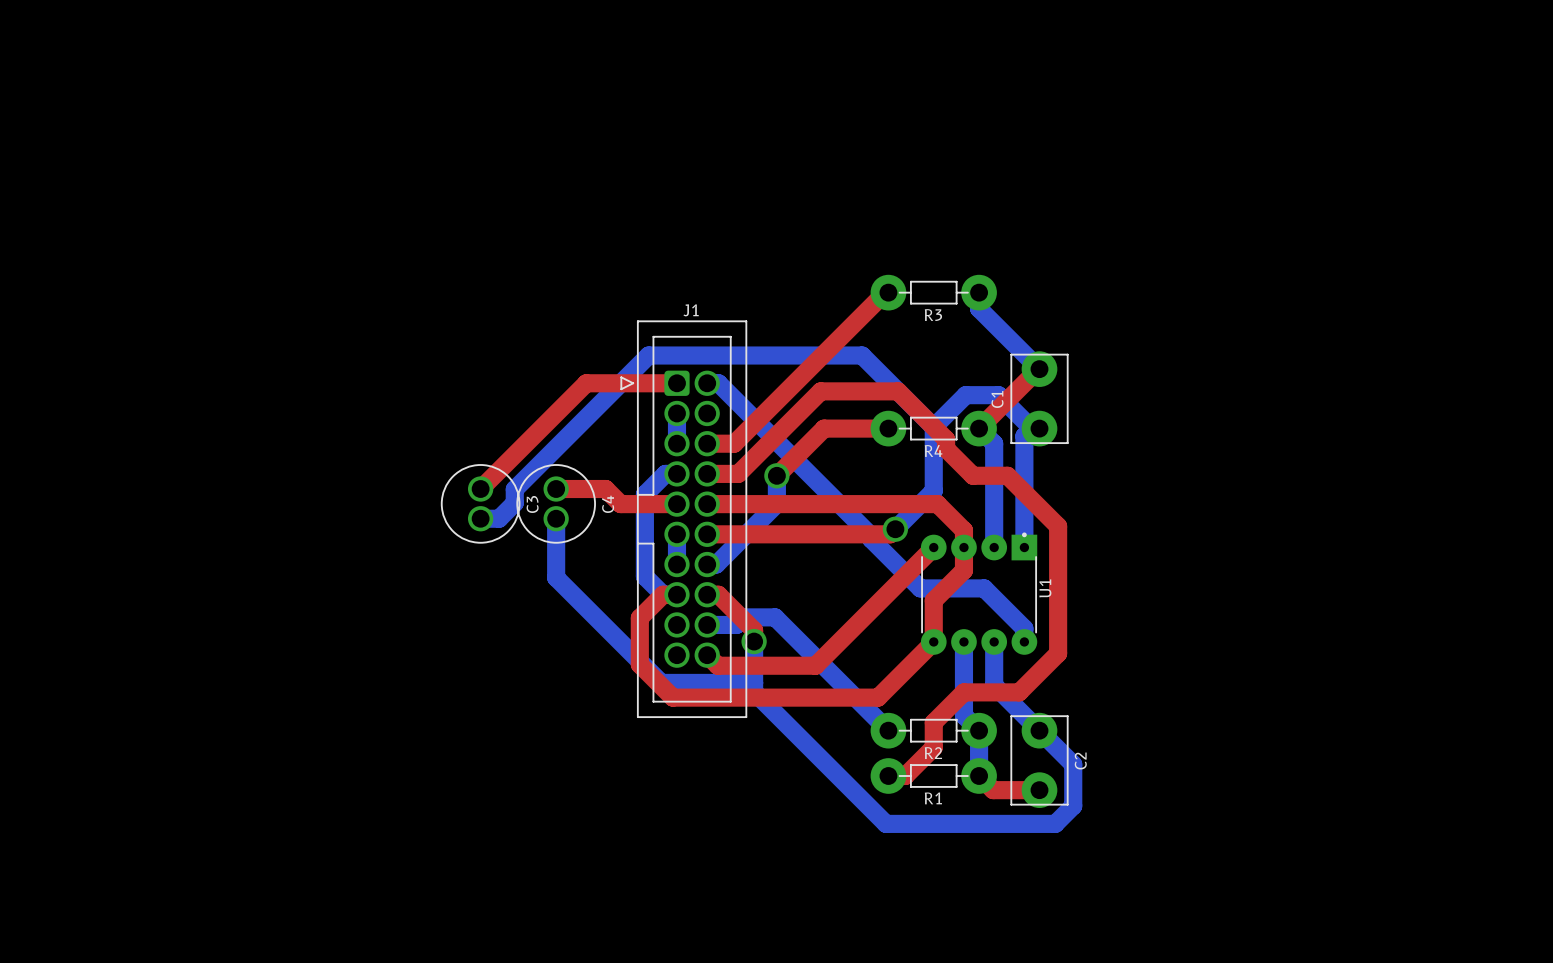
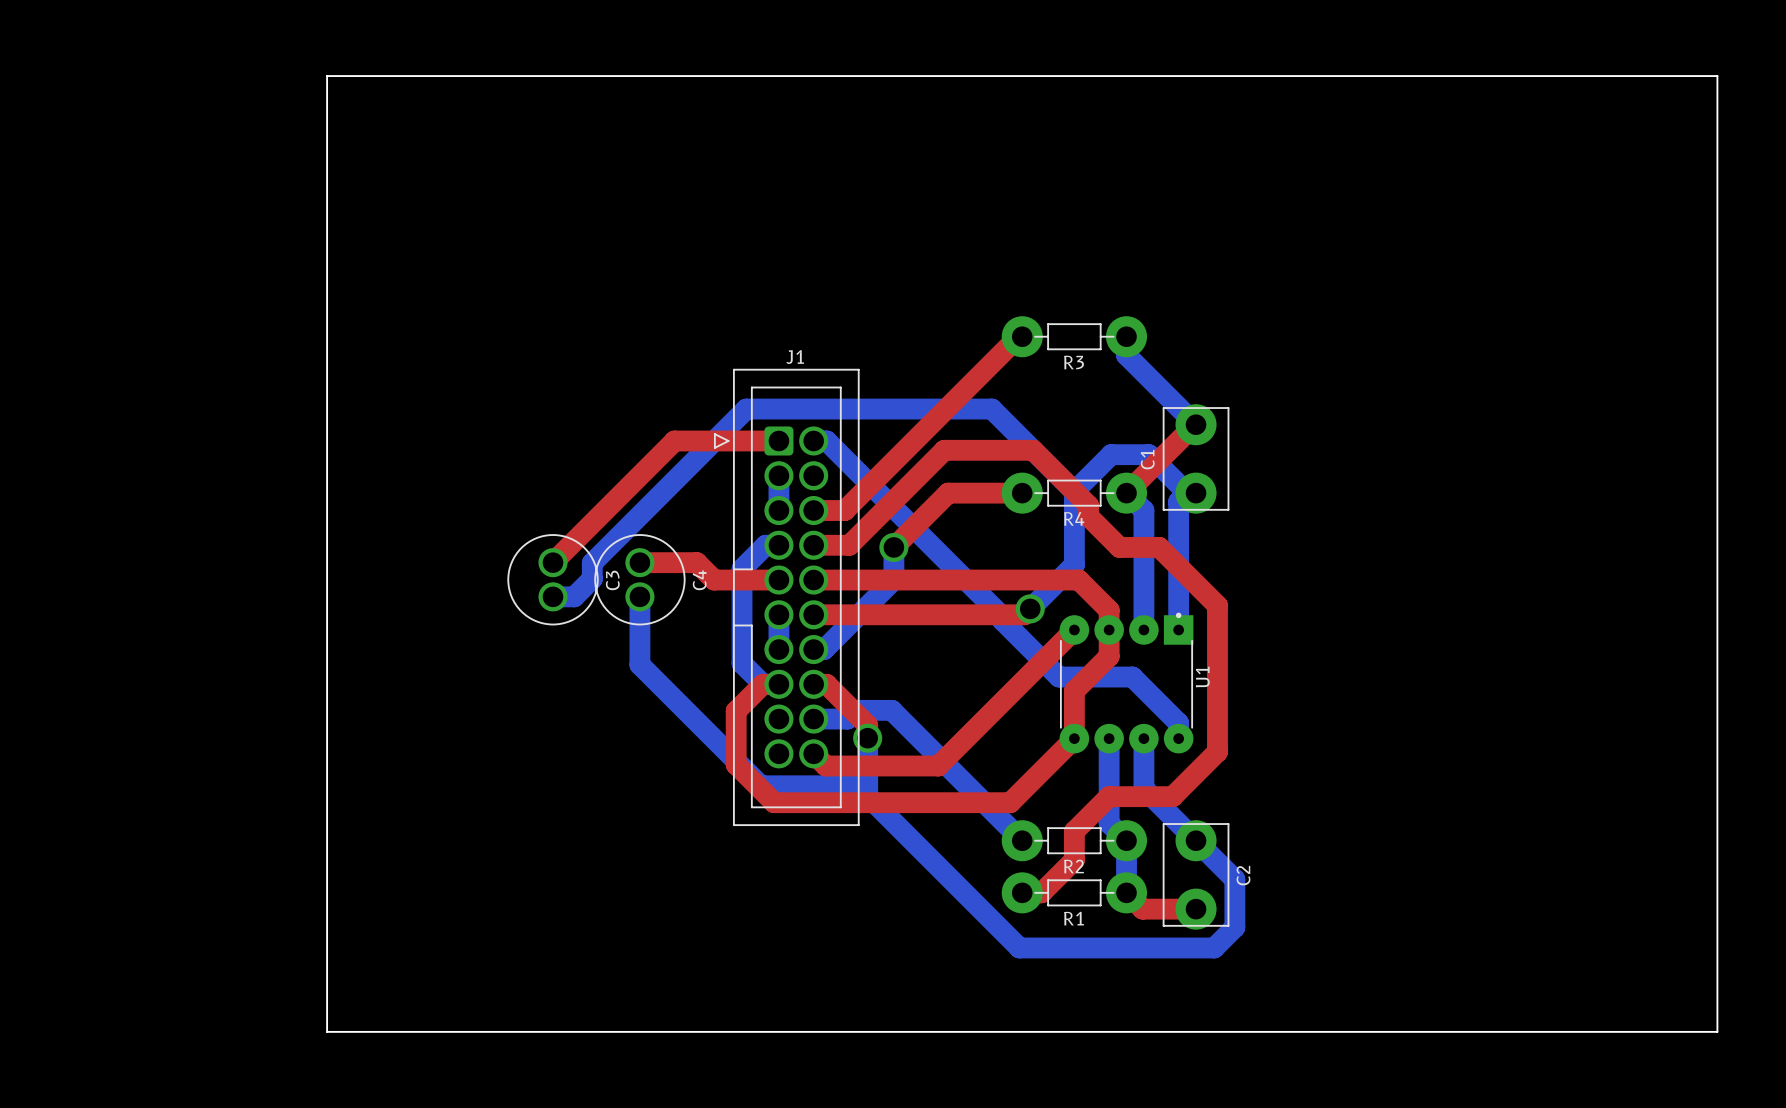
board edge: none -> (327, 76) (327, 1031) (1717, 1031) (1717, 76) (327, 76)

